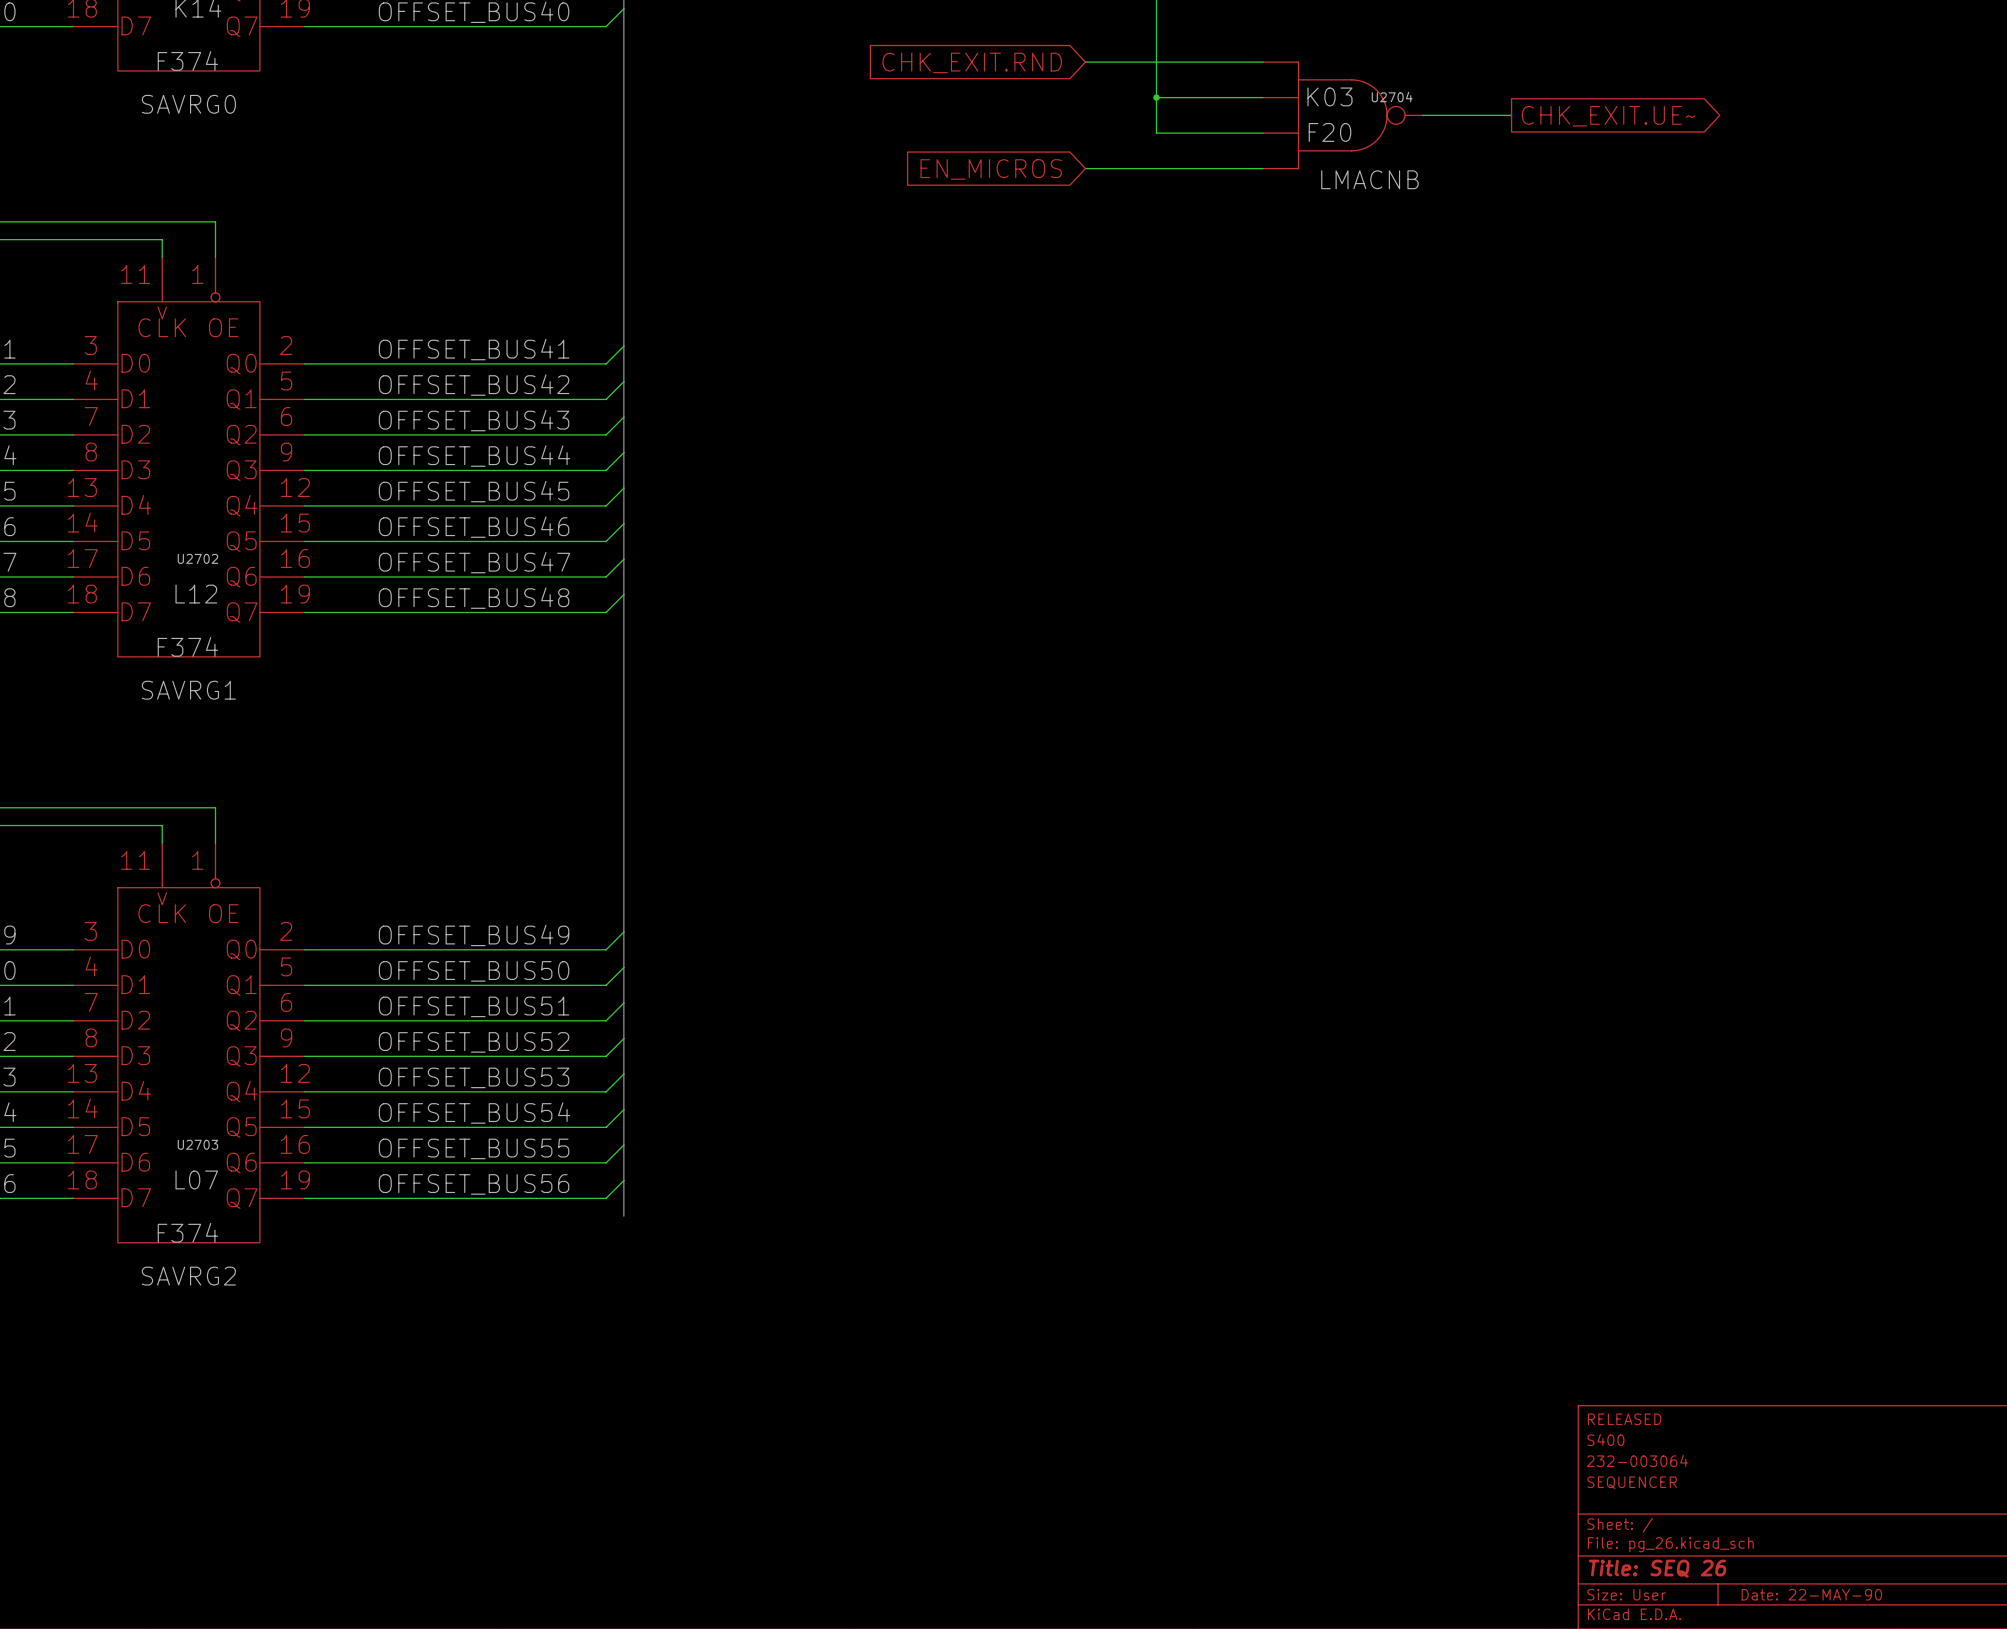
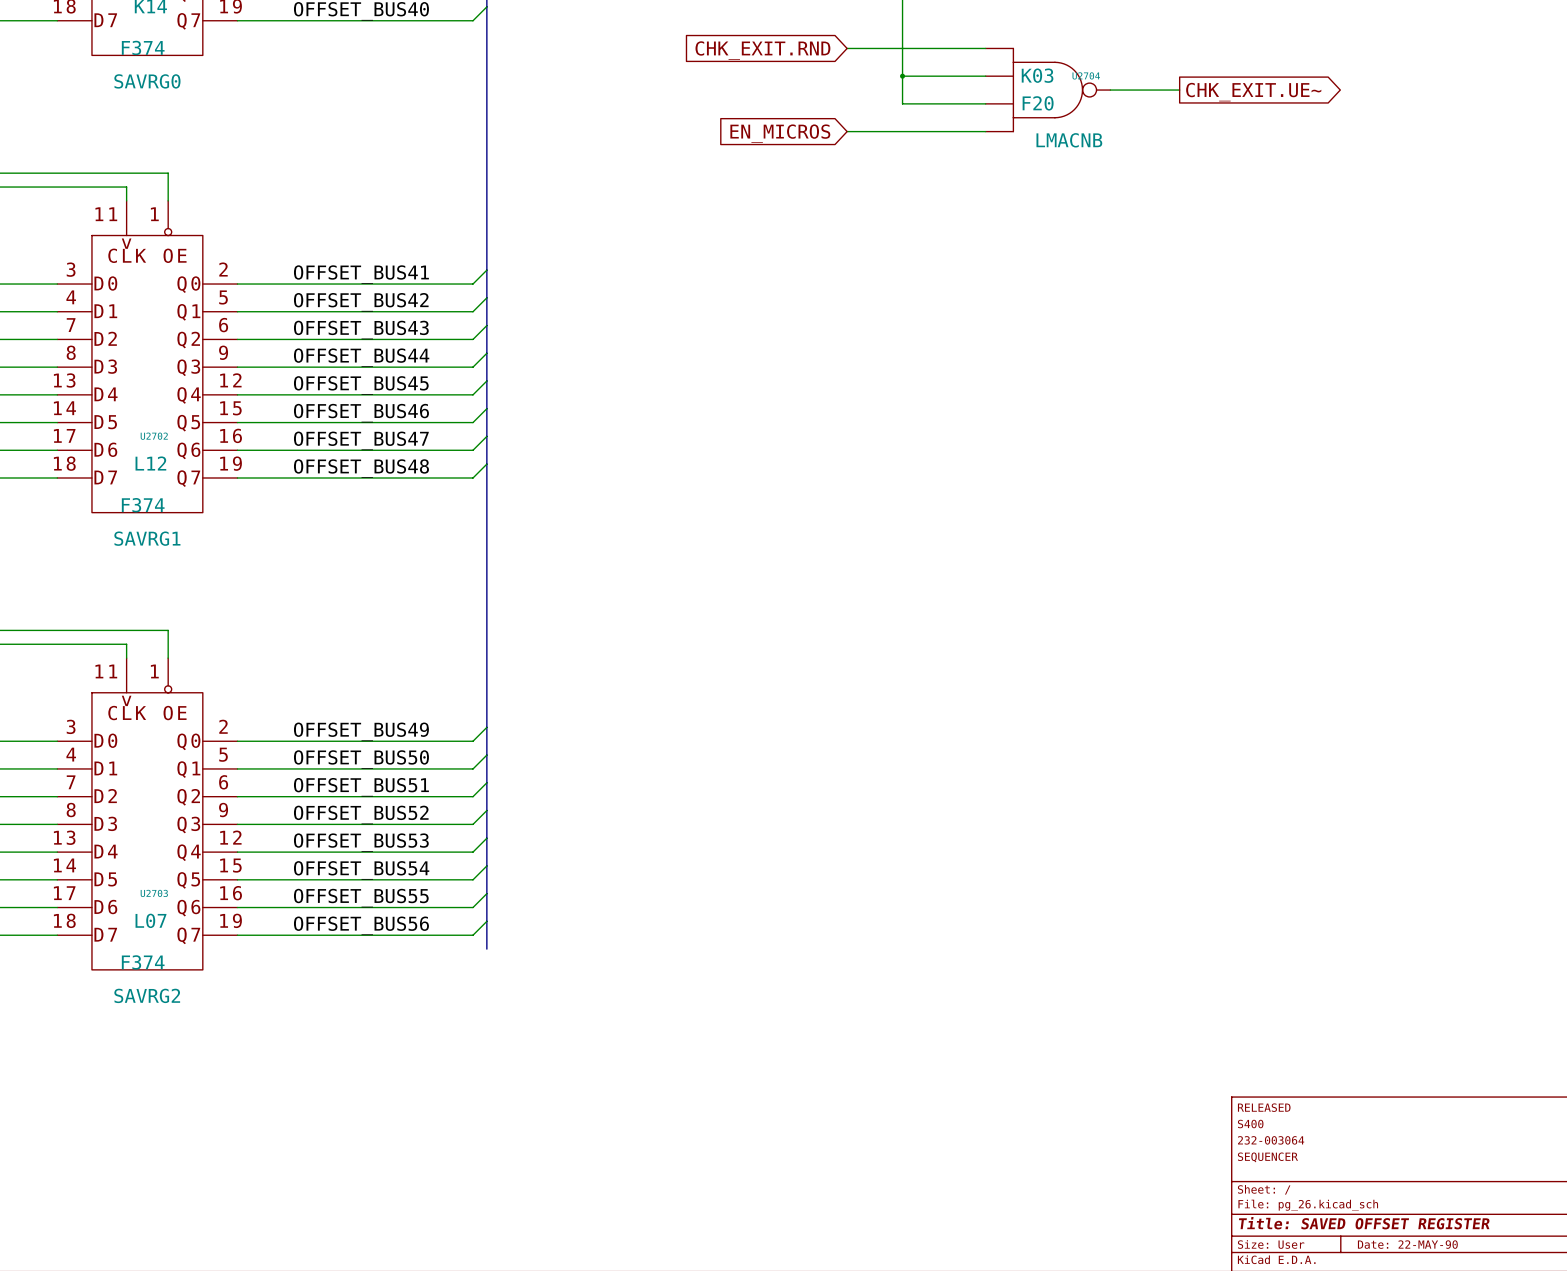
title block: Title: SEQ 26 (1657, 1568) -> Title: SAVED OFFSET REGISTER (1364, 1223)

